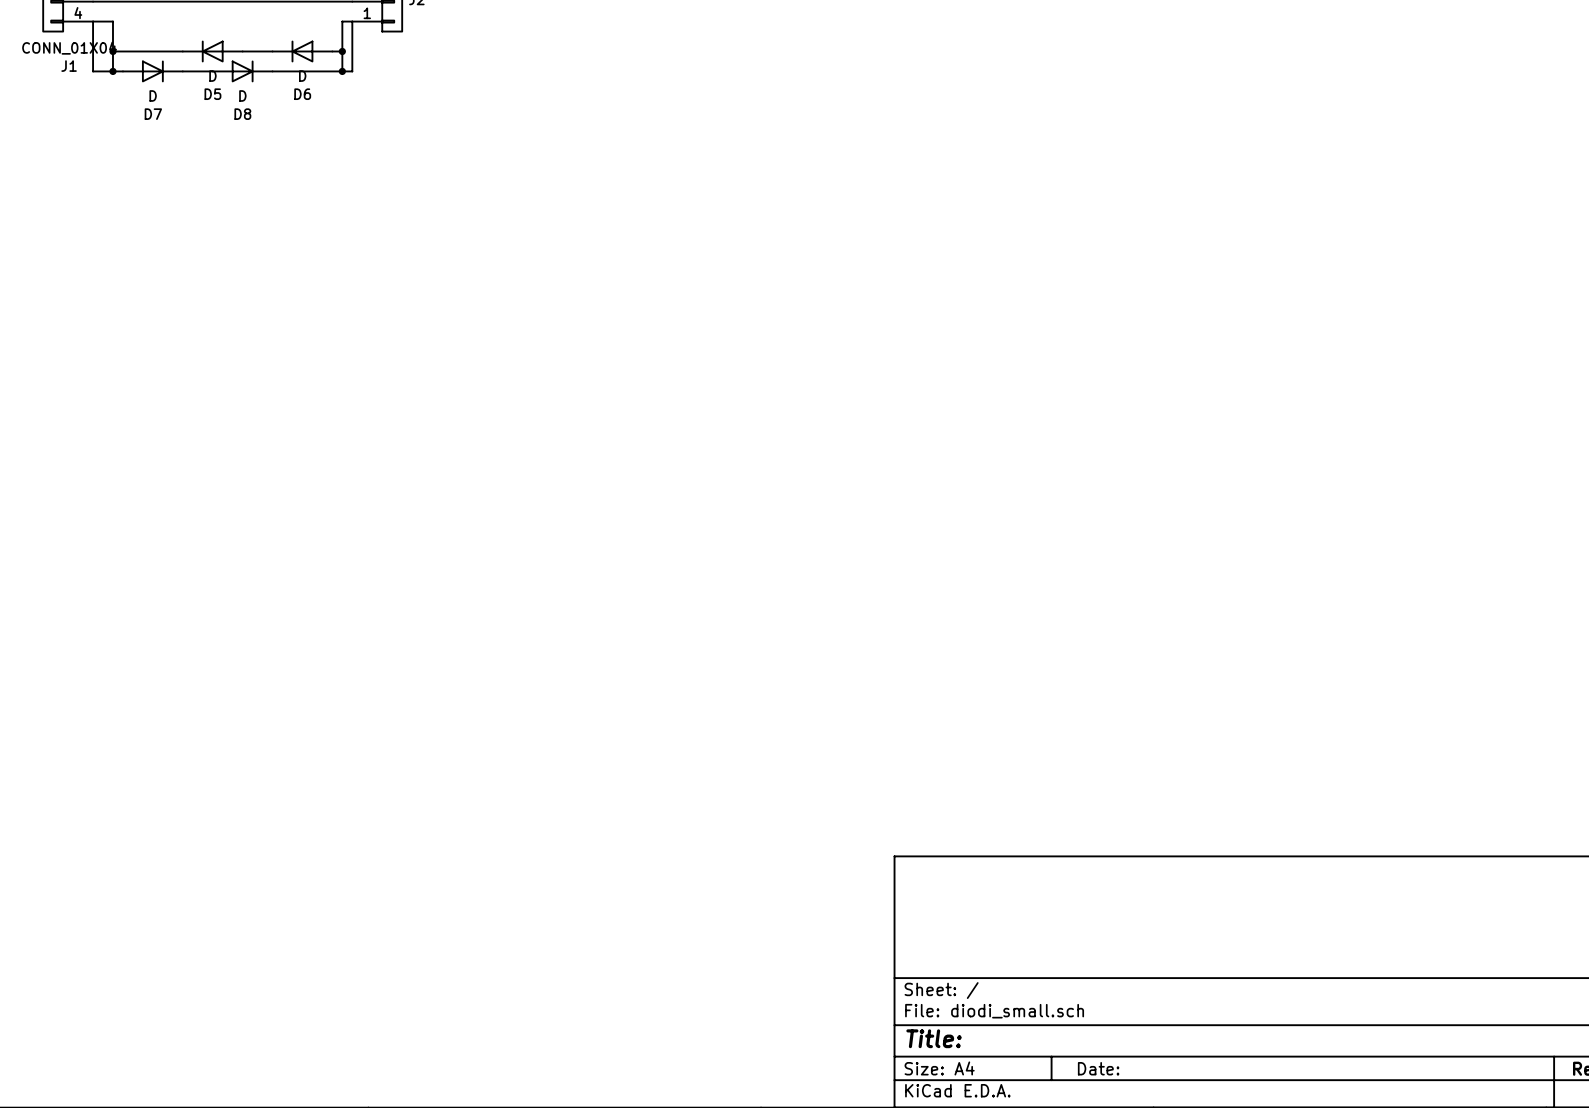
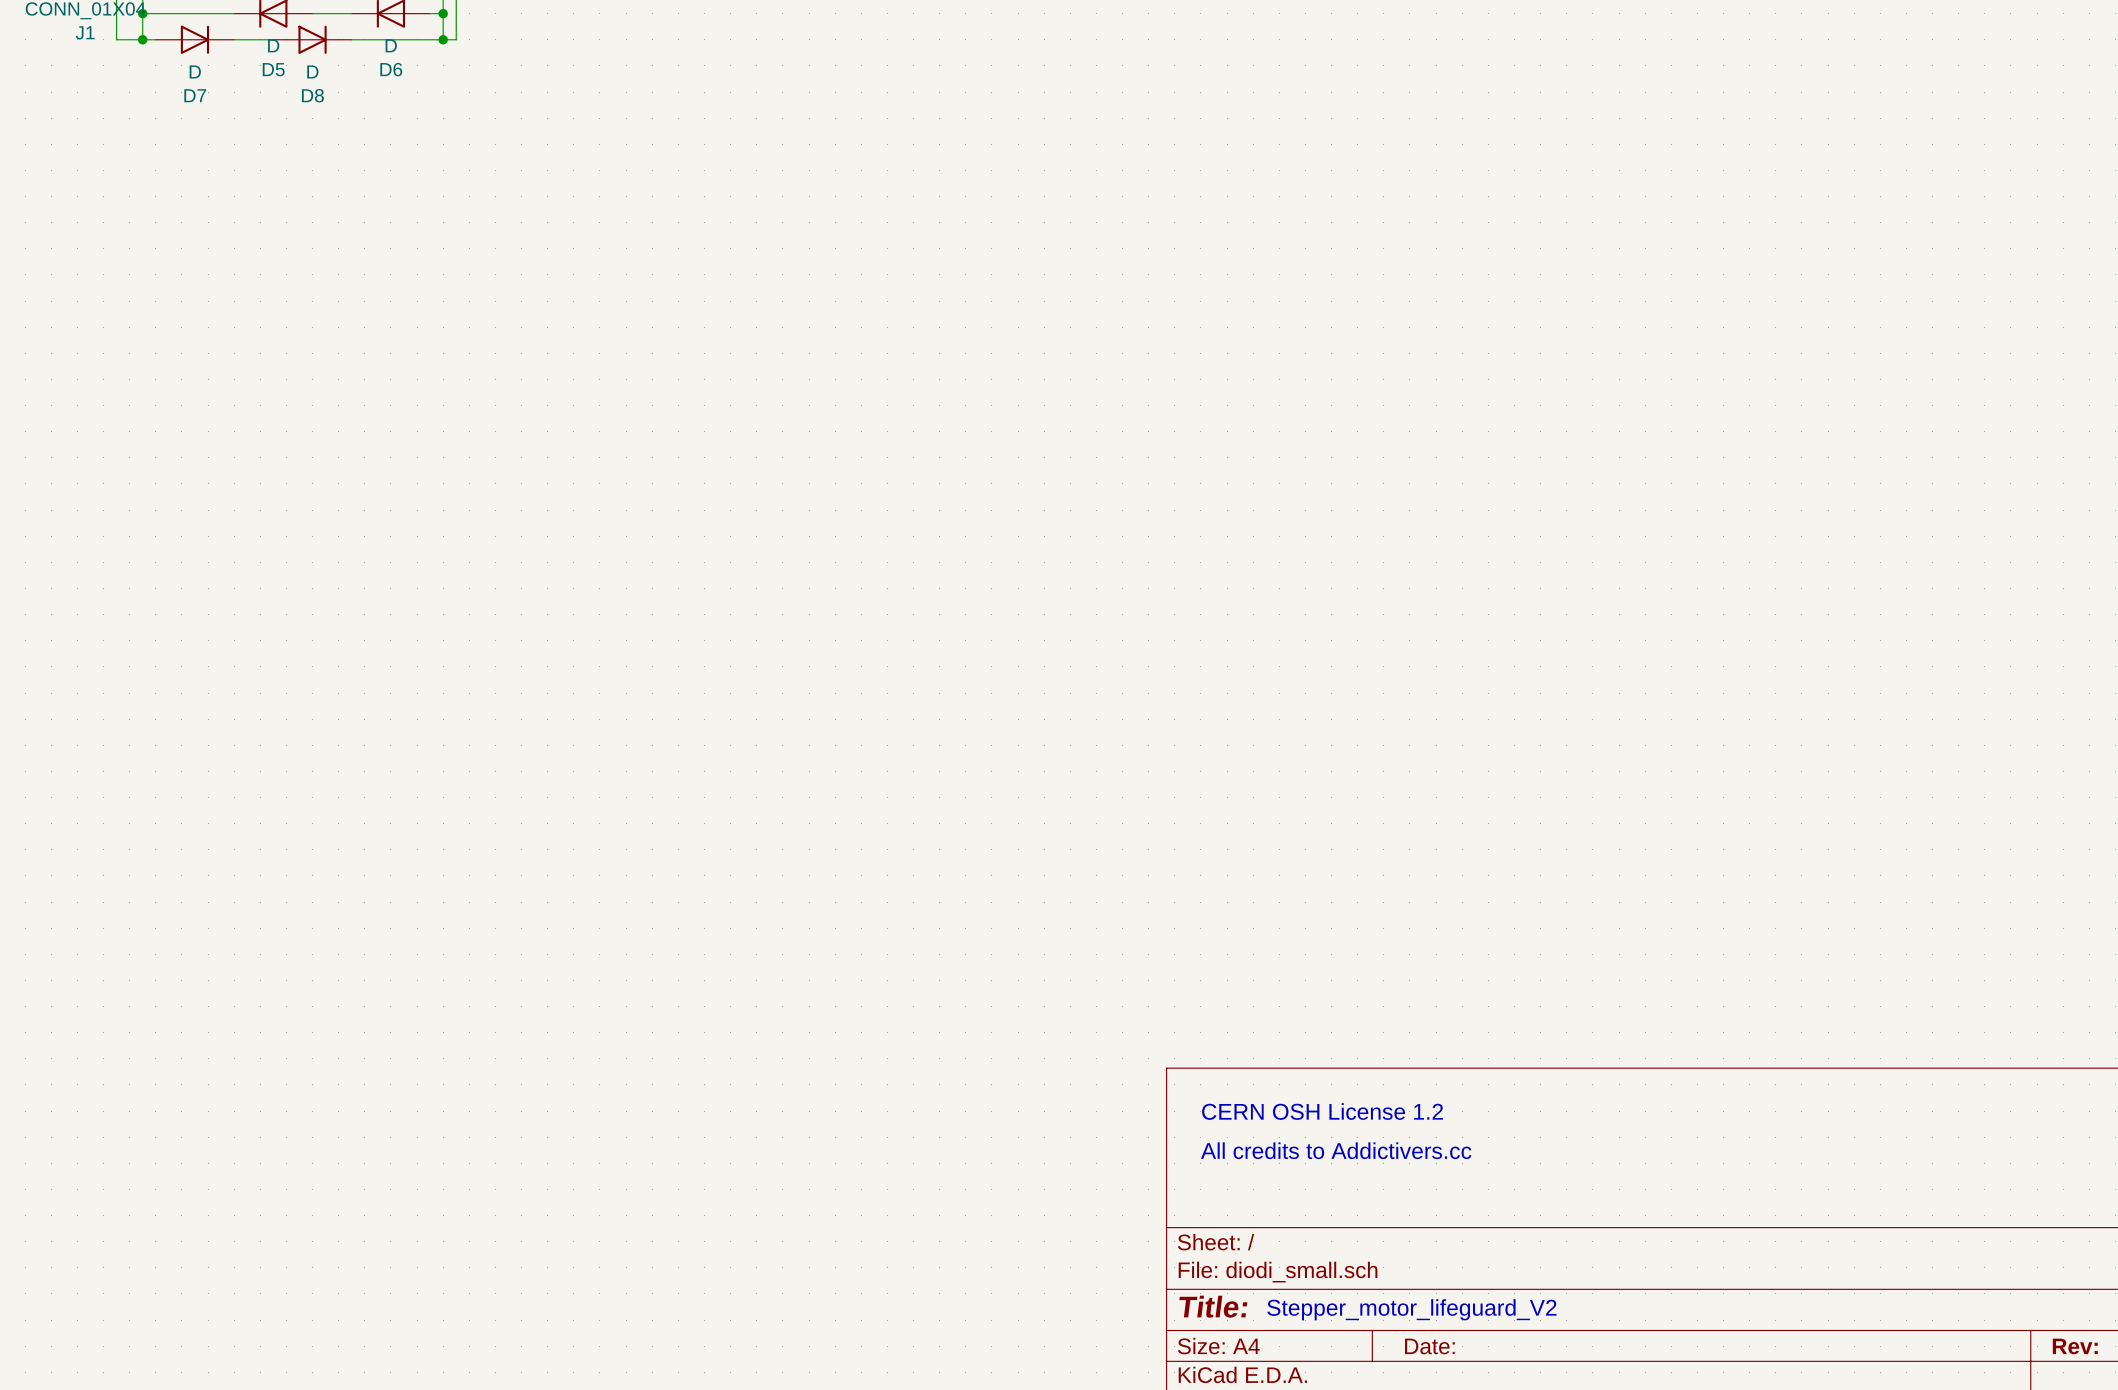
text: none -> CERN OSH License 1.2 (1322, 1111)
text: none -> All credits to Addictivers.cc (1336, 1150)
text: none -> Stepper_motor_lifeguard_V2 (1411, 1309)

